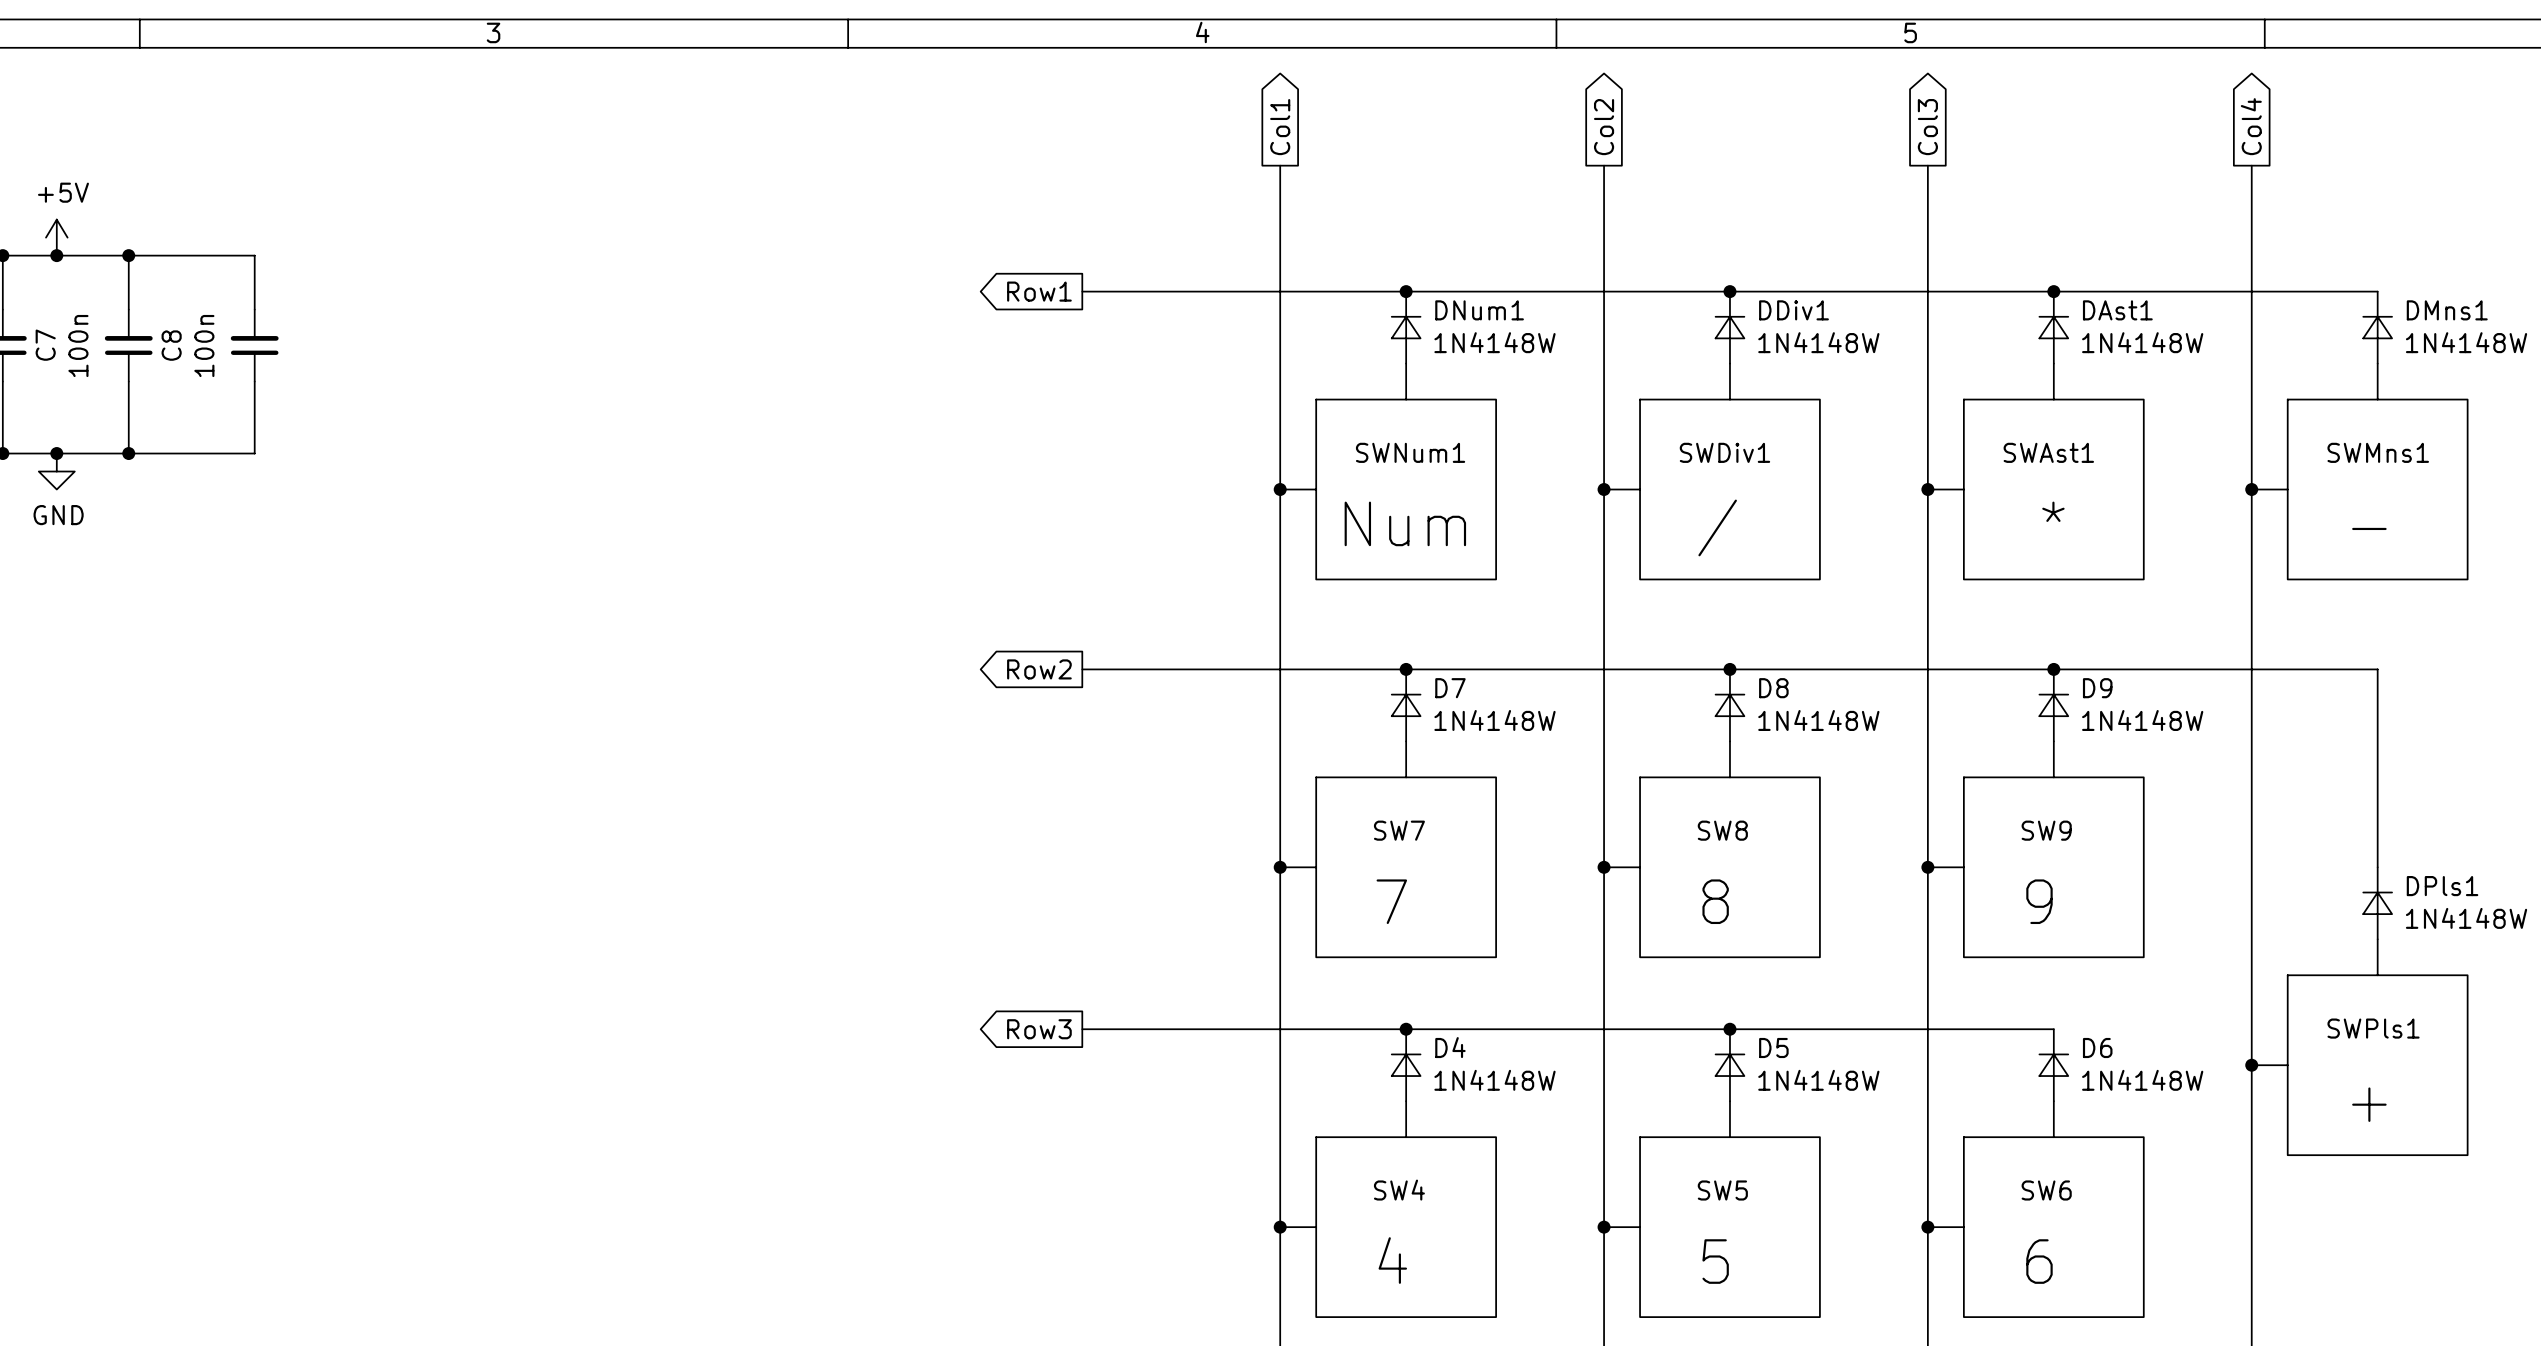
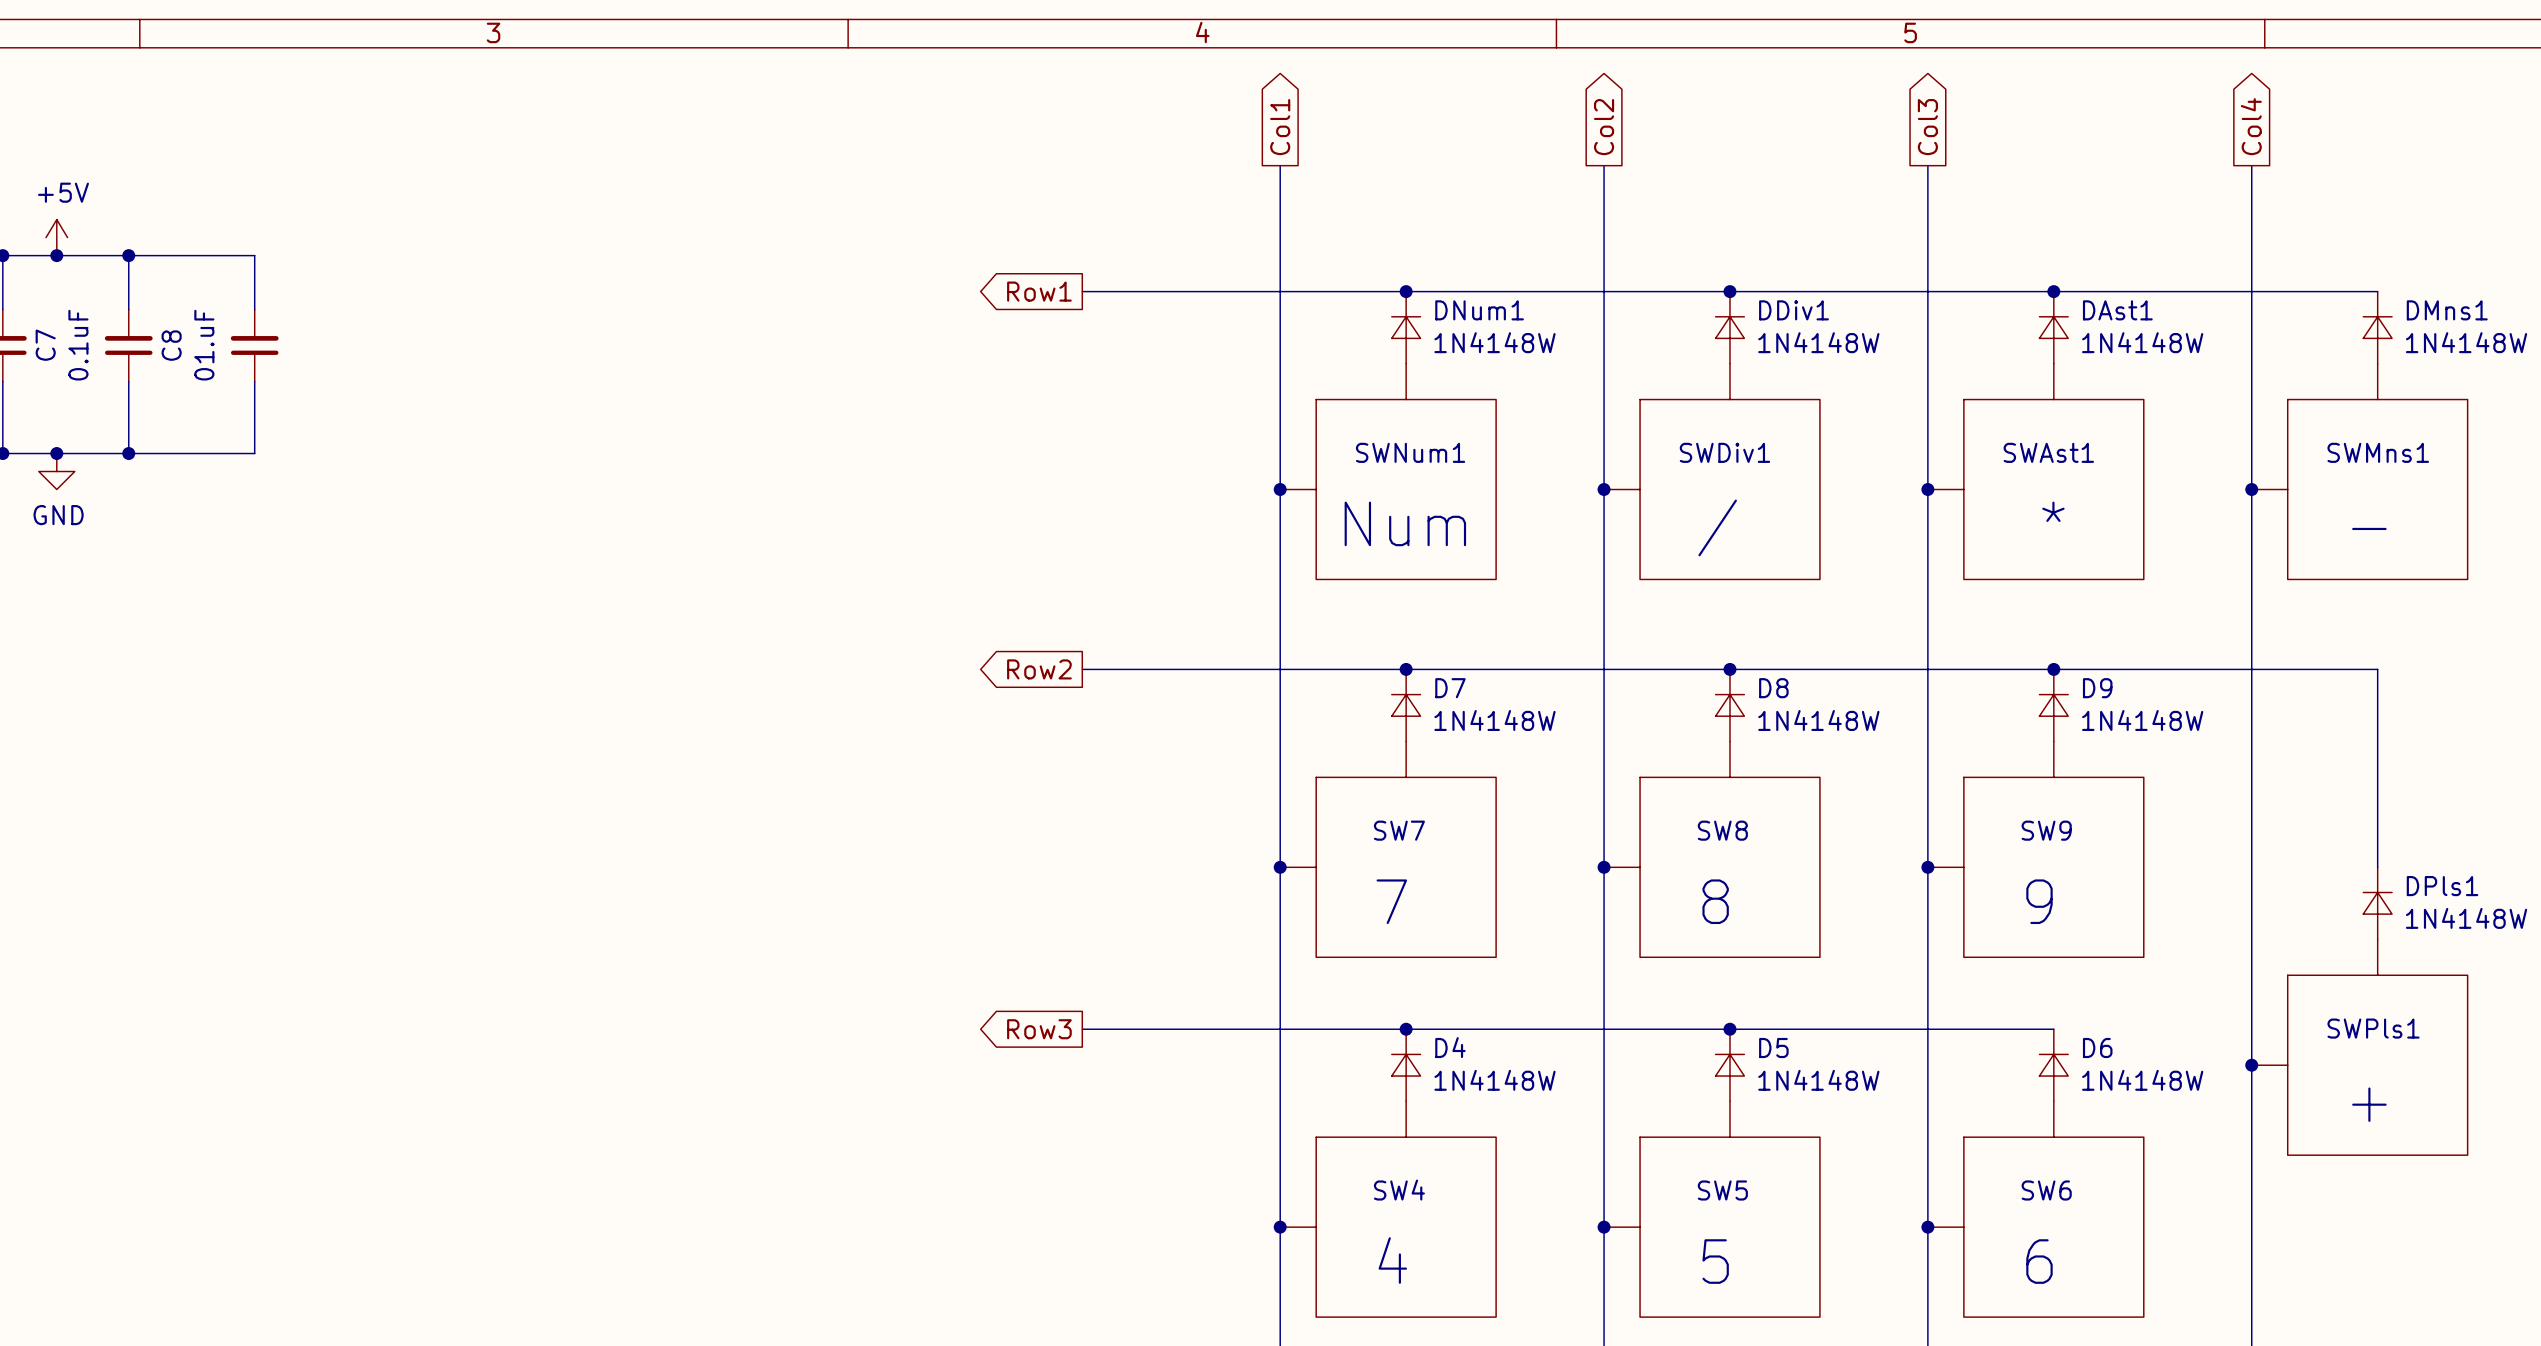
C7 value: 100n (78, 346) -> 0.1uF (78, 345)
C8 value: 100n (204, 346) -> 01.uF (204, 345)

